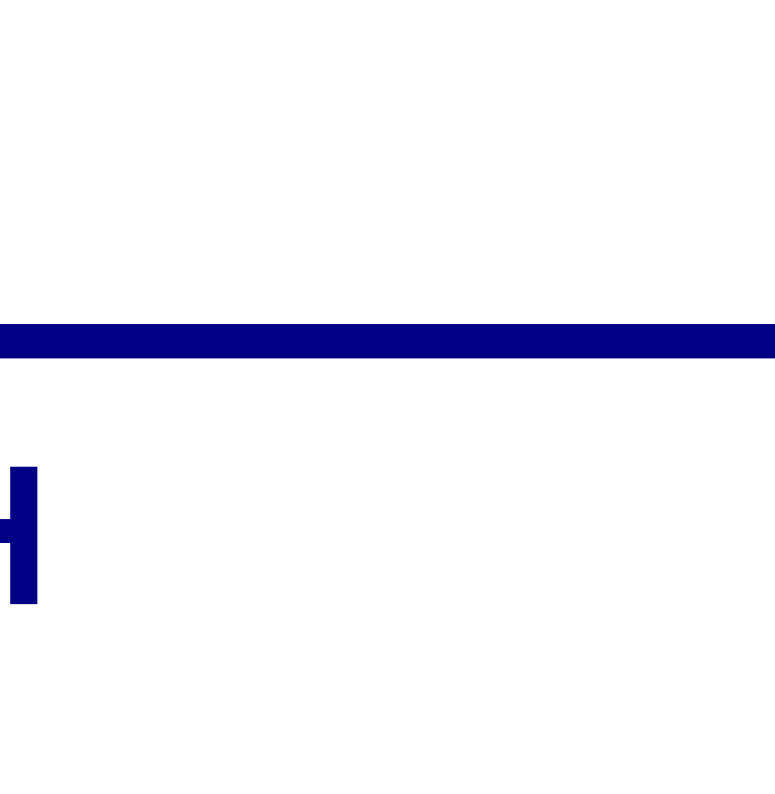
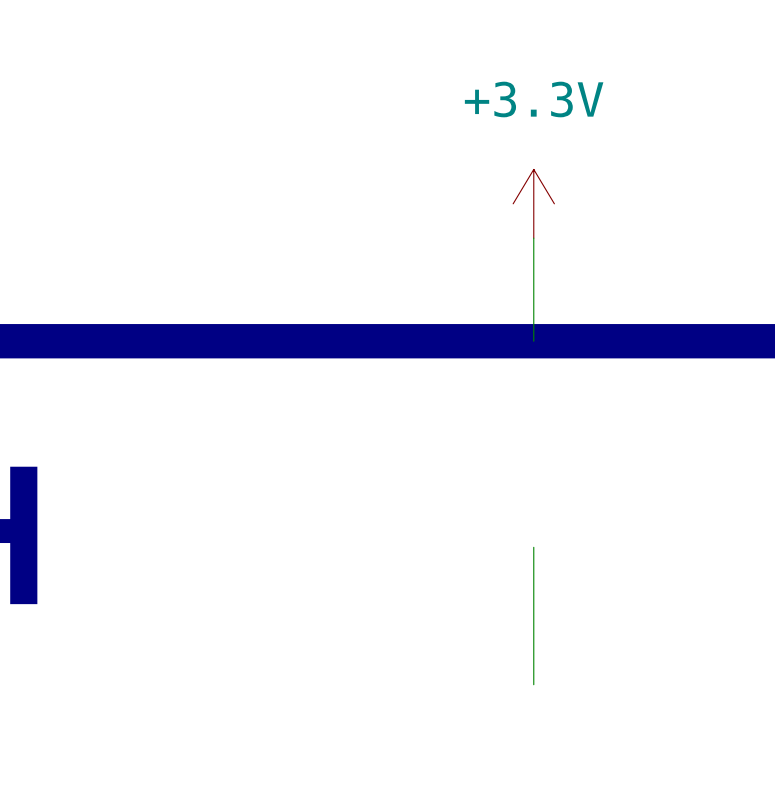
power symbol: none -> +3.3V (533, 203)
wire: none -> (533, 238) (533, 341)
wire: none -> (533, 547) (533, 684)

